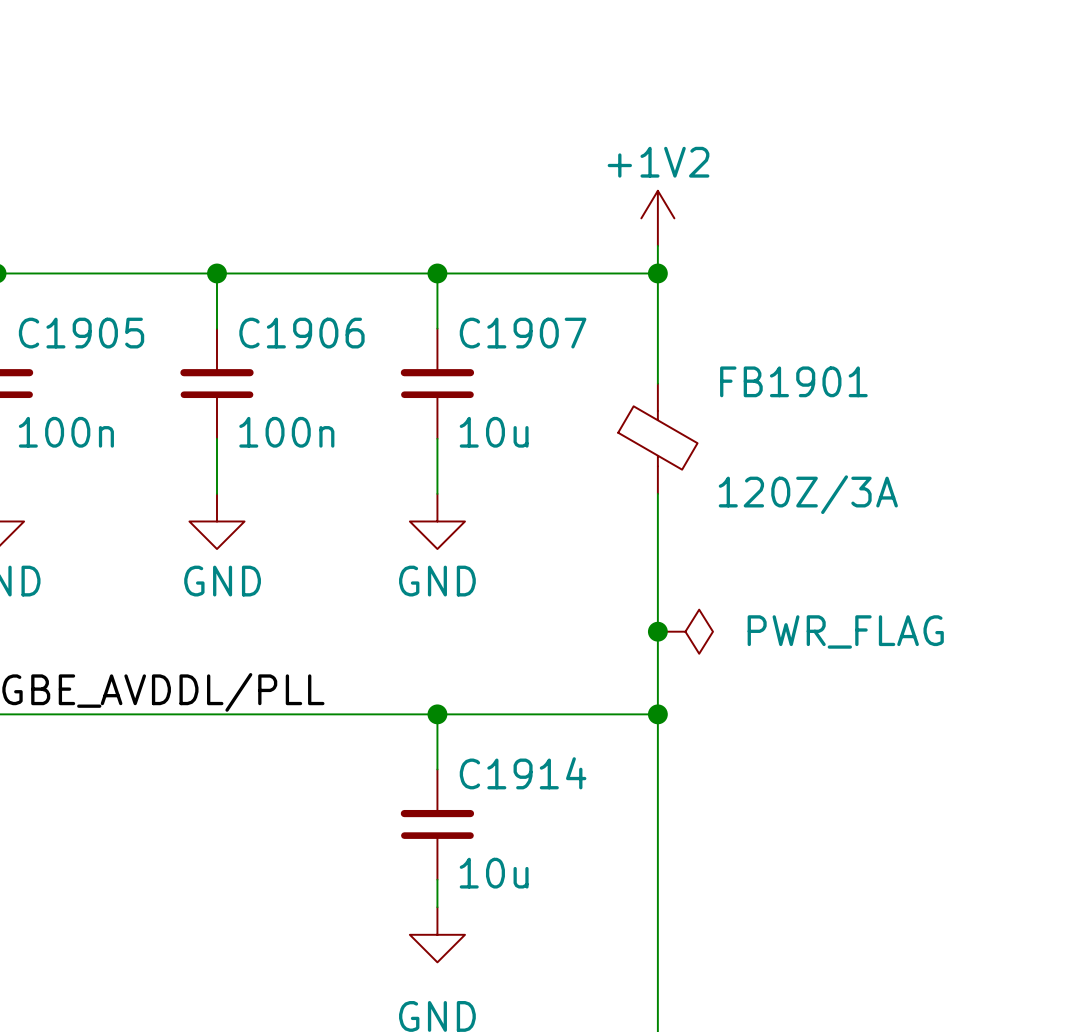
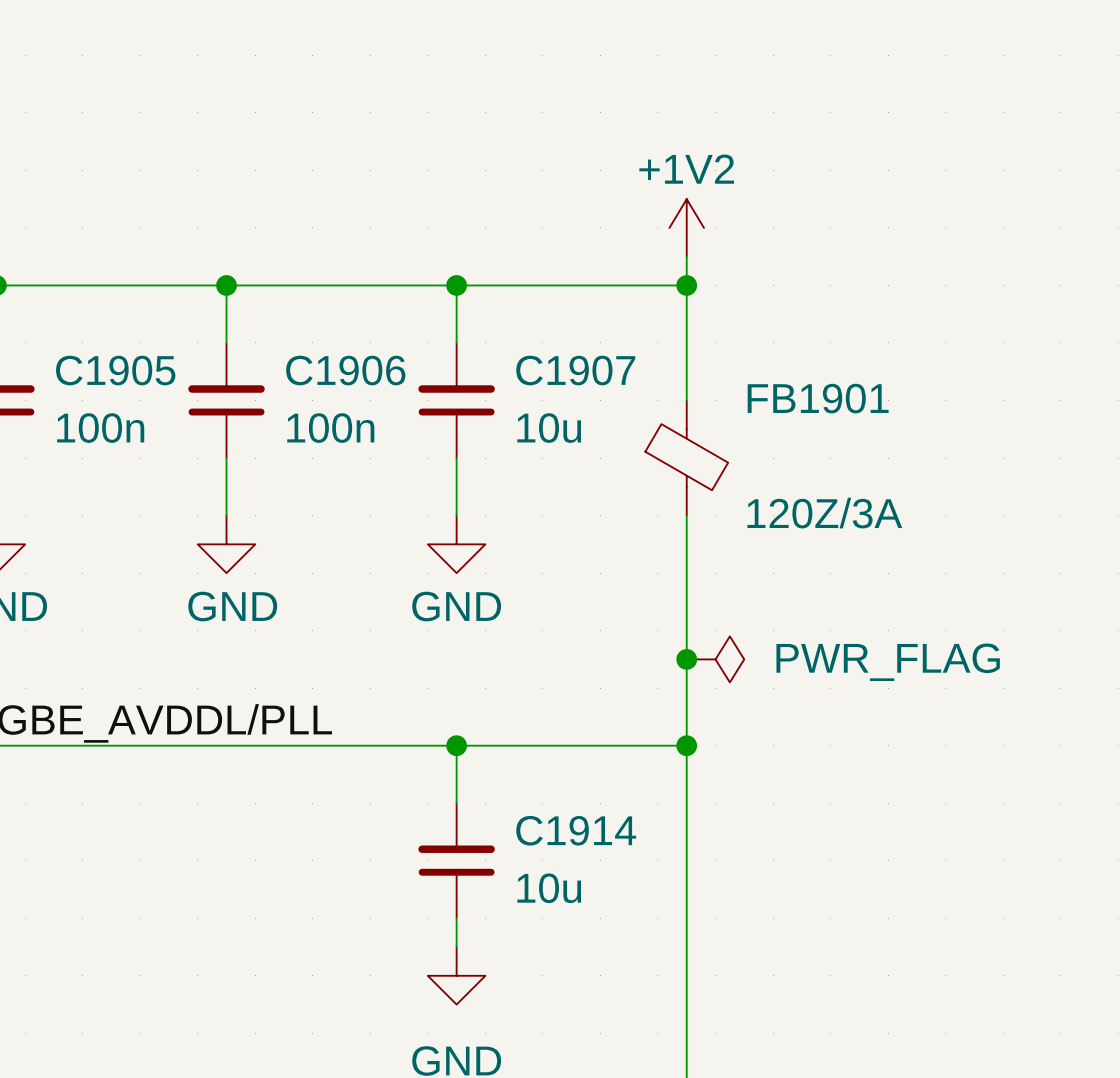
C1905 name position: C1905 (81, 333) -> C1905 (115, 370)
C1906 name position: C1906 (301, 333) -> C1906 (345, 370)
C1907 name position: C1907 (523, 333) -> C1907 (575, 370)
C1905 text position: 100n (66, 432) -> 100n (100, 428)
C1906 text position: 100n (286, 432) -> 100n (330, 428)
C1907 text position: 10u (494, 432) -> 10u (549, 428)
C1914 name position: C1914 (523, 773) -> C1914 (576, 830)
C1914 text position: 10u (494, 873) -> 10u (549, 888)

